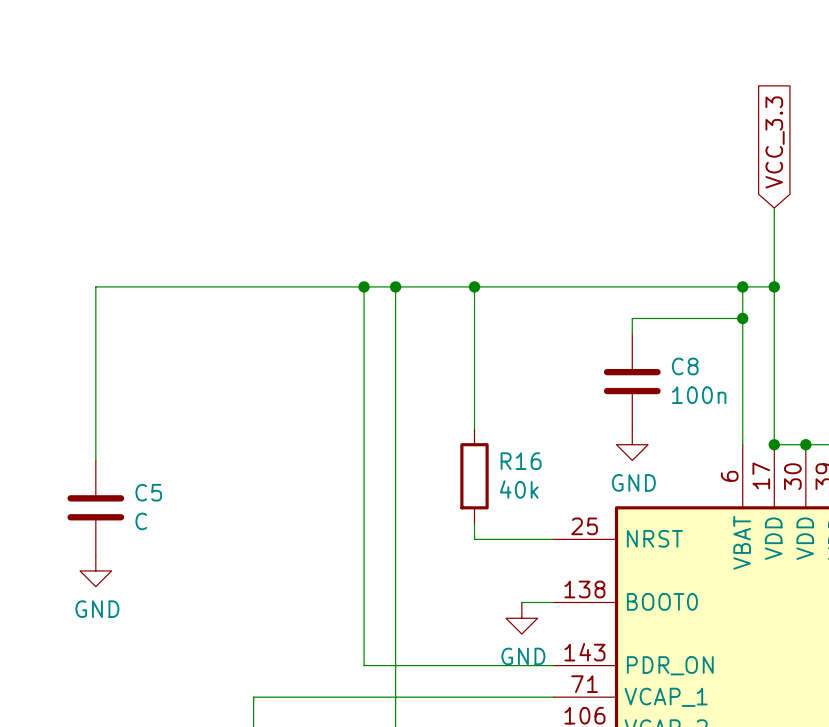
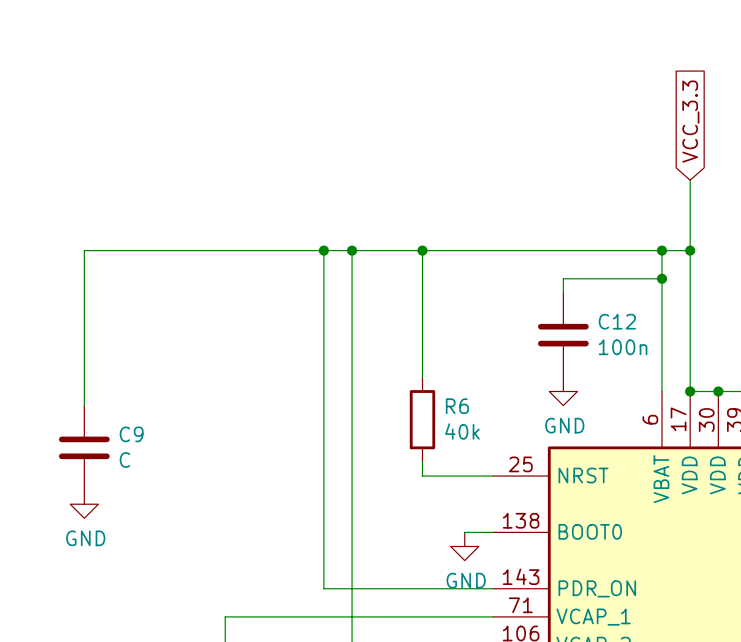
C8 name: C8 (685, 366) -> C12 (617, 321)
R16 name: R16 (521, 461) -> R6 (457, 406)
C5 name: C5 (148, 492) -> C9 (131, 434)

